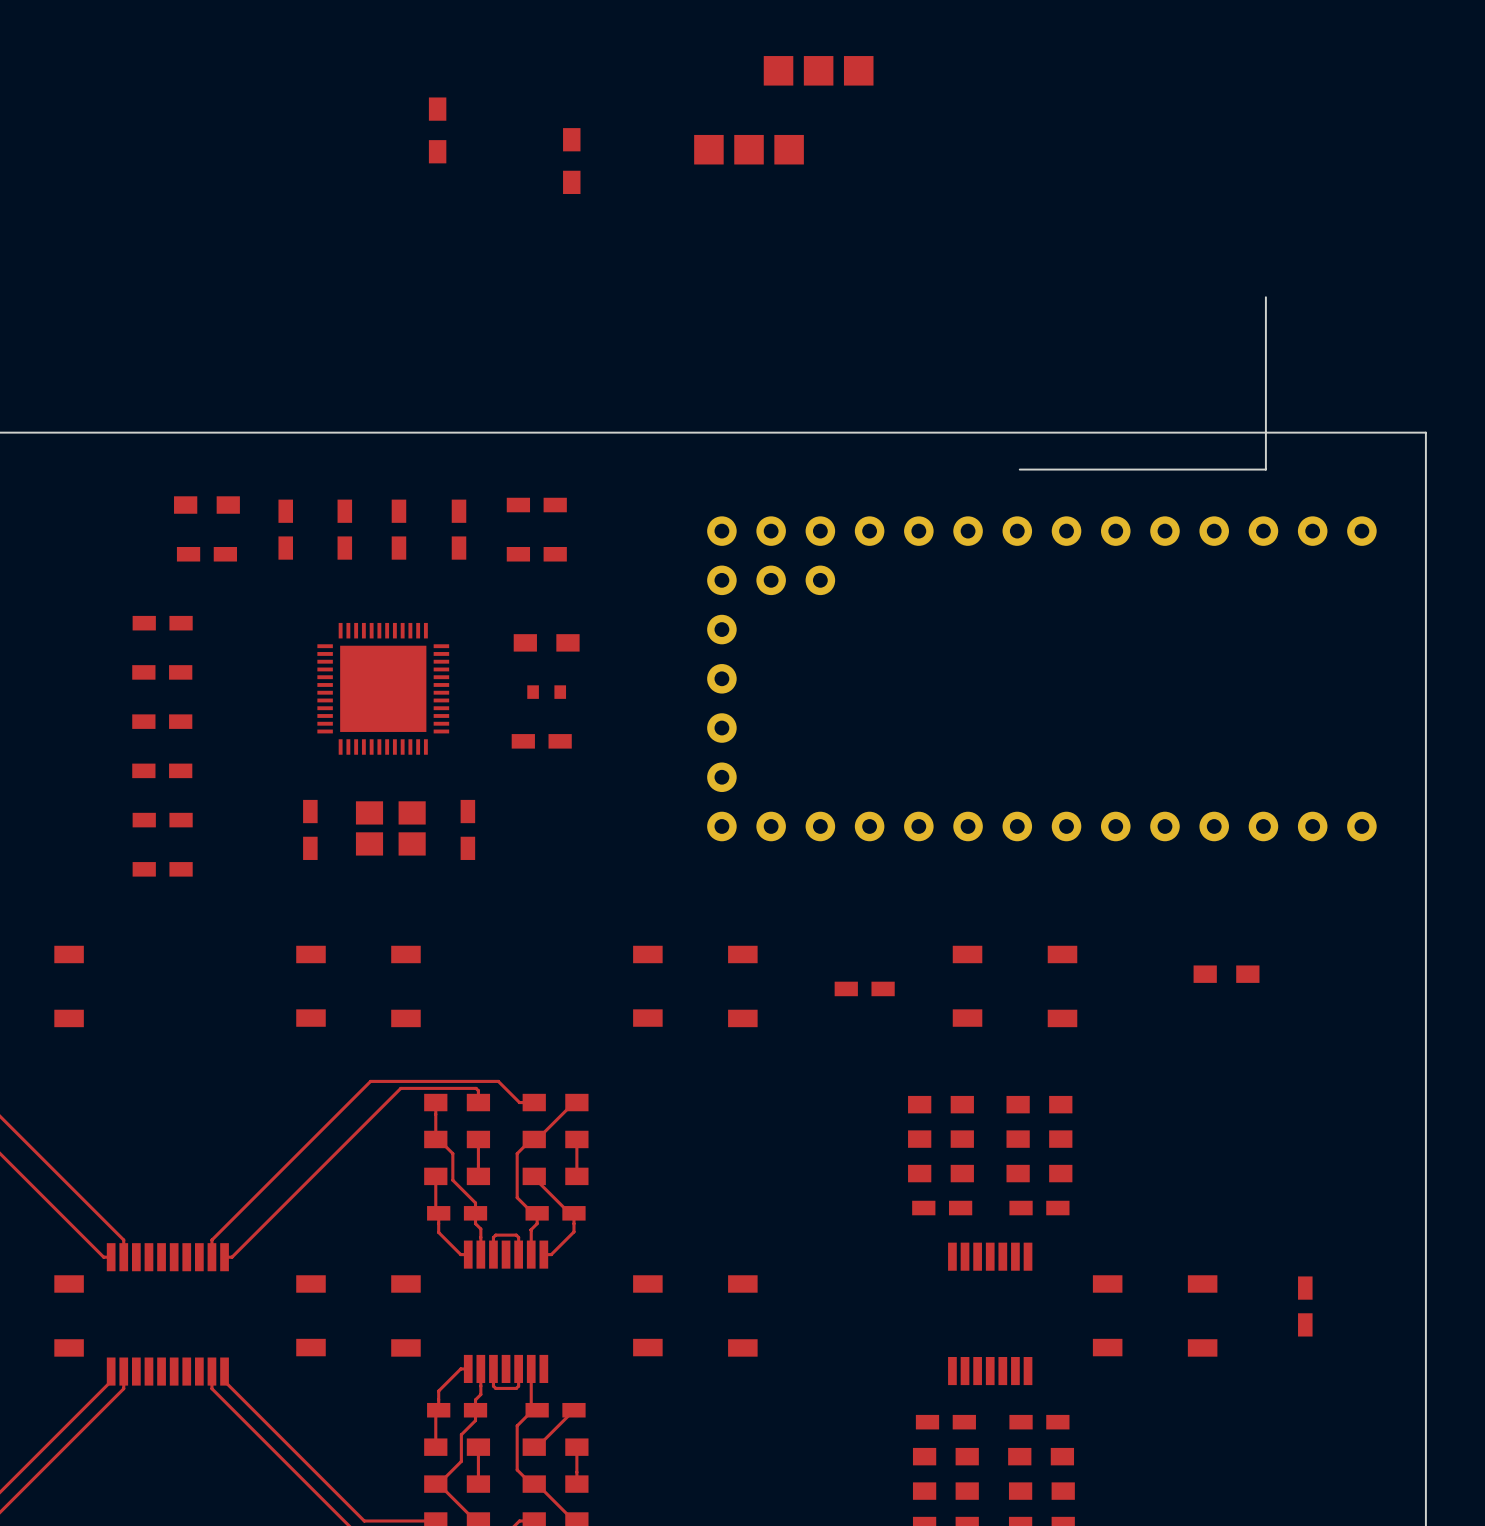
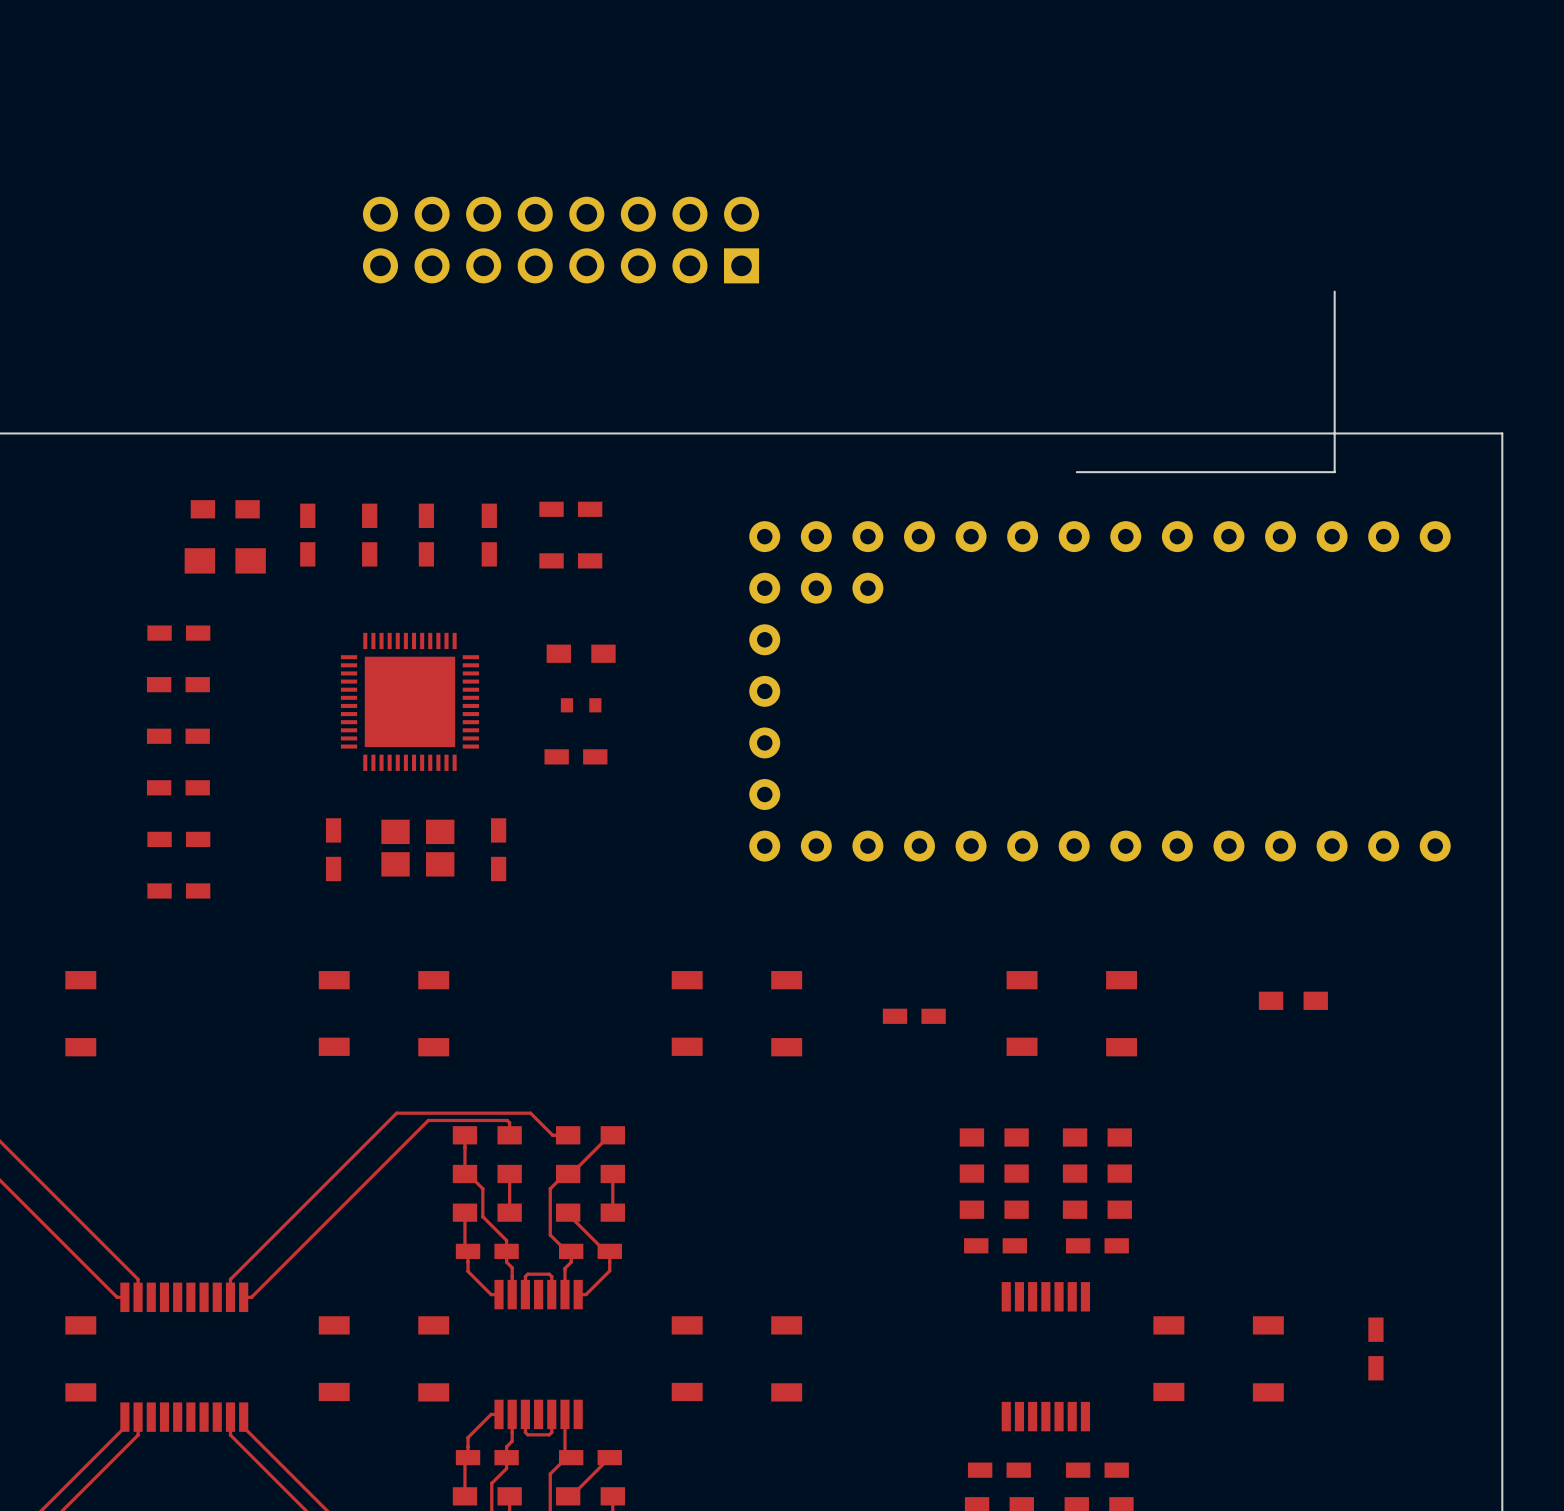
part: (818, 70) -> none
part: (437, 130) -> none
part: (749, 149) -> none
part: (571, 161) -> none
part: none -> (561, 240)
part footprint: [176, 546, 238, 562] -> [184, 548, 266, 574]

